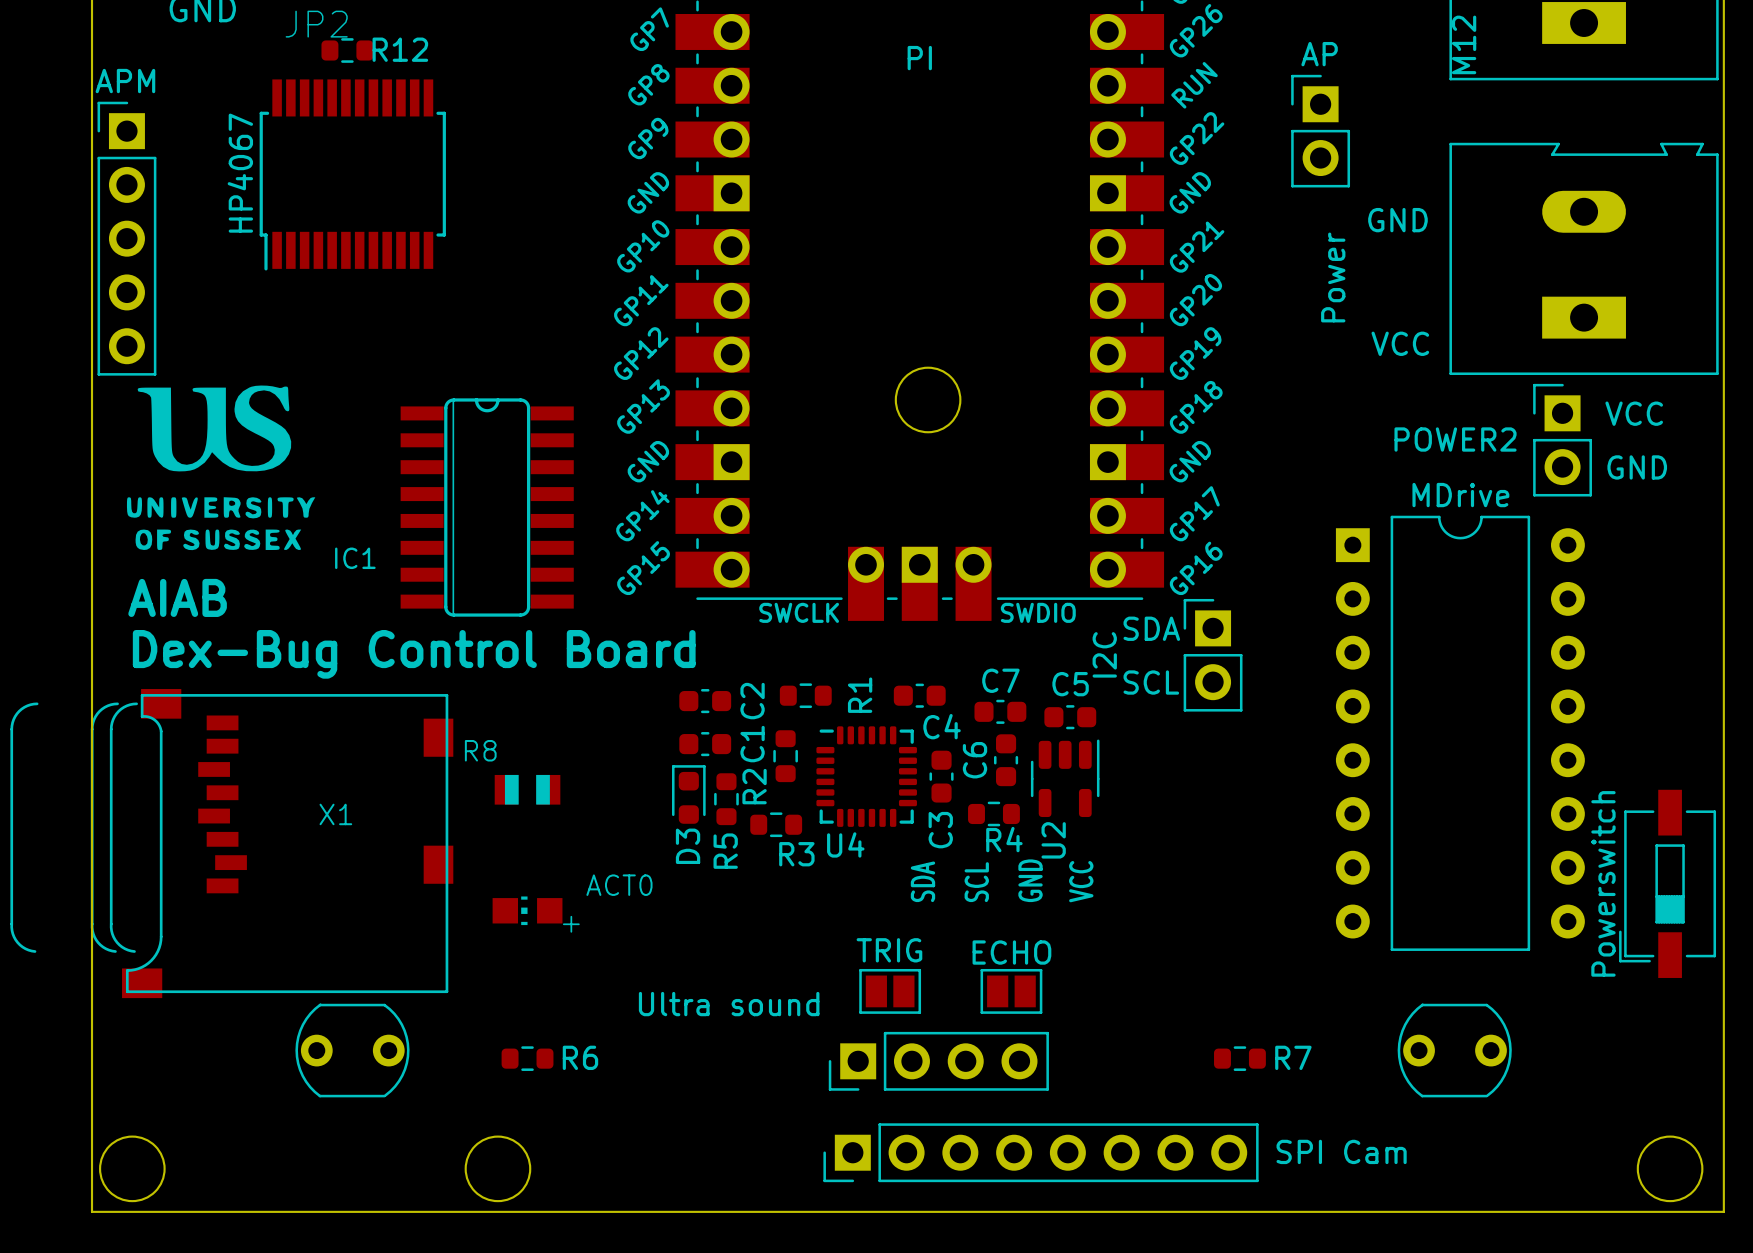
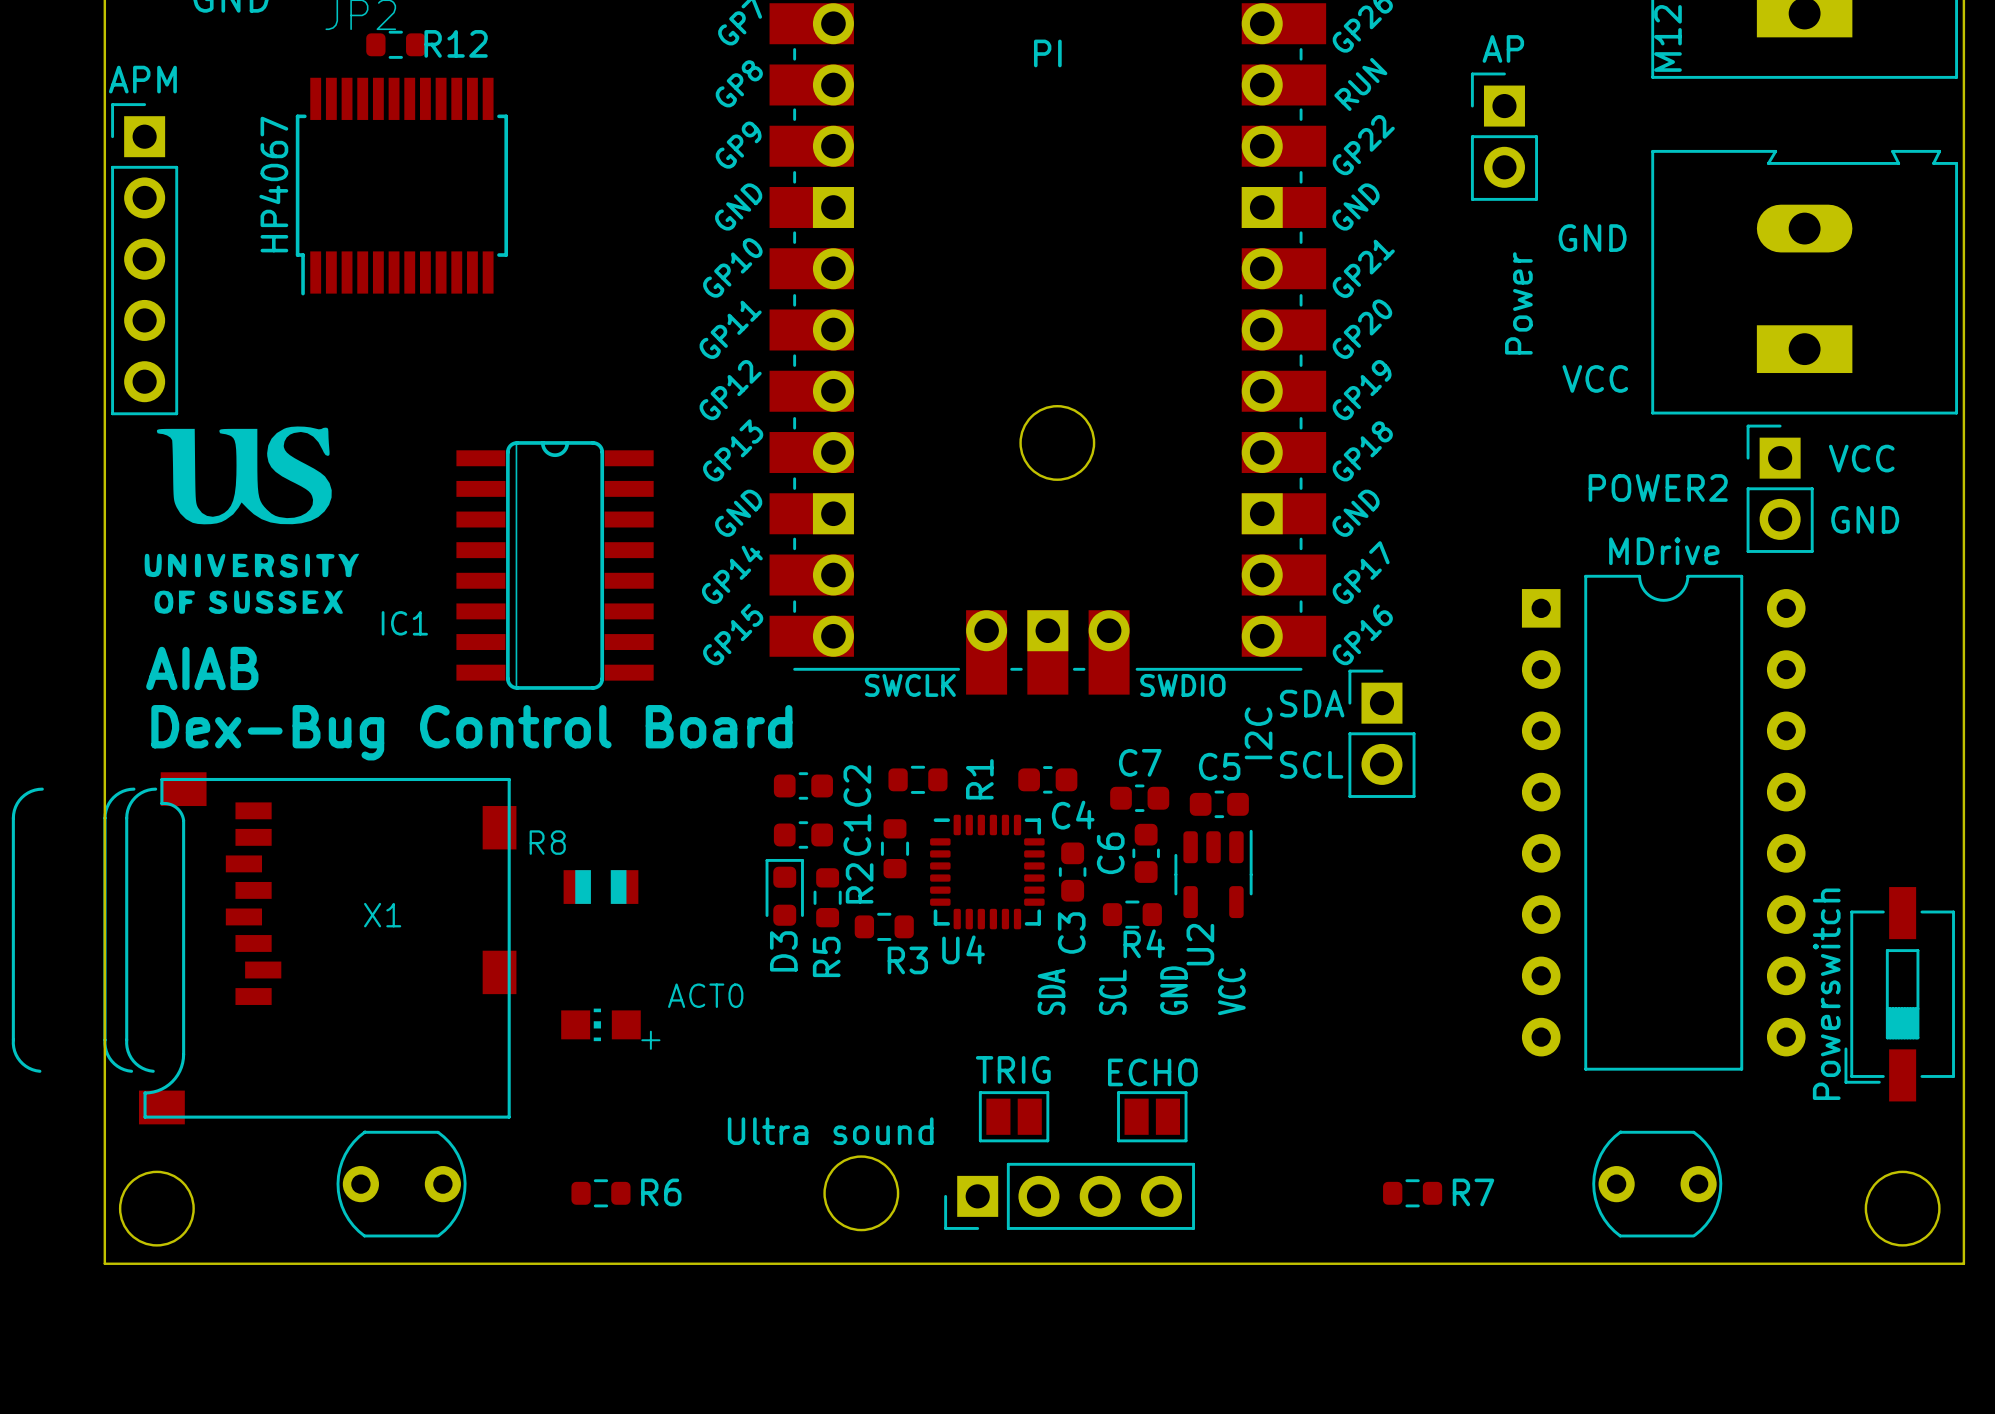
round board edge: none -> [823, 1155, 900, 1232]
board edge: (92, 1120) (92, 1211) (1723, 1211) (1723, 1120) -> (104, 1263) (1963, 1263)
round board edge: [464, 1135, 532, 1203] -> none
SPI Cam: (1041, 1152) -> none
round board edge position: (132, 1168) -> (156, 1208)
round board edge position: (1670, 1168) -> (1902, 1208)

